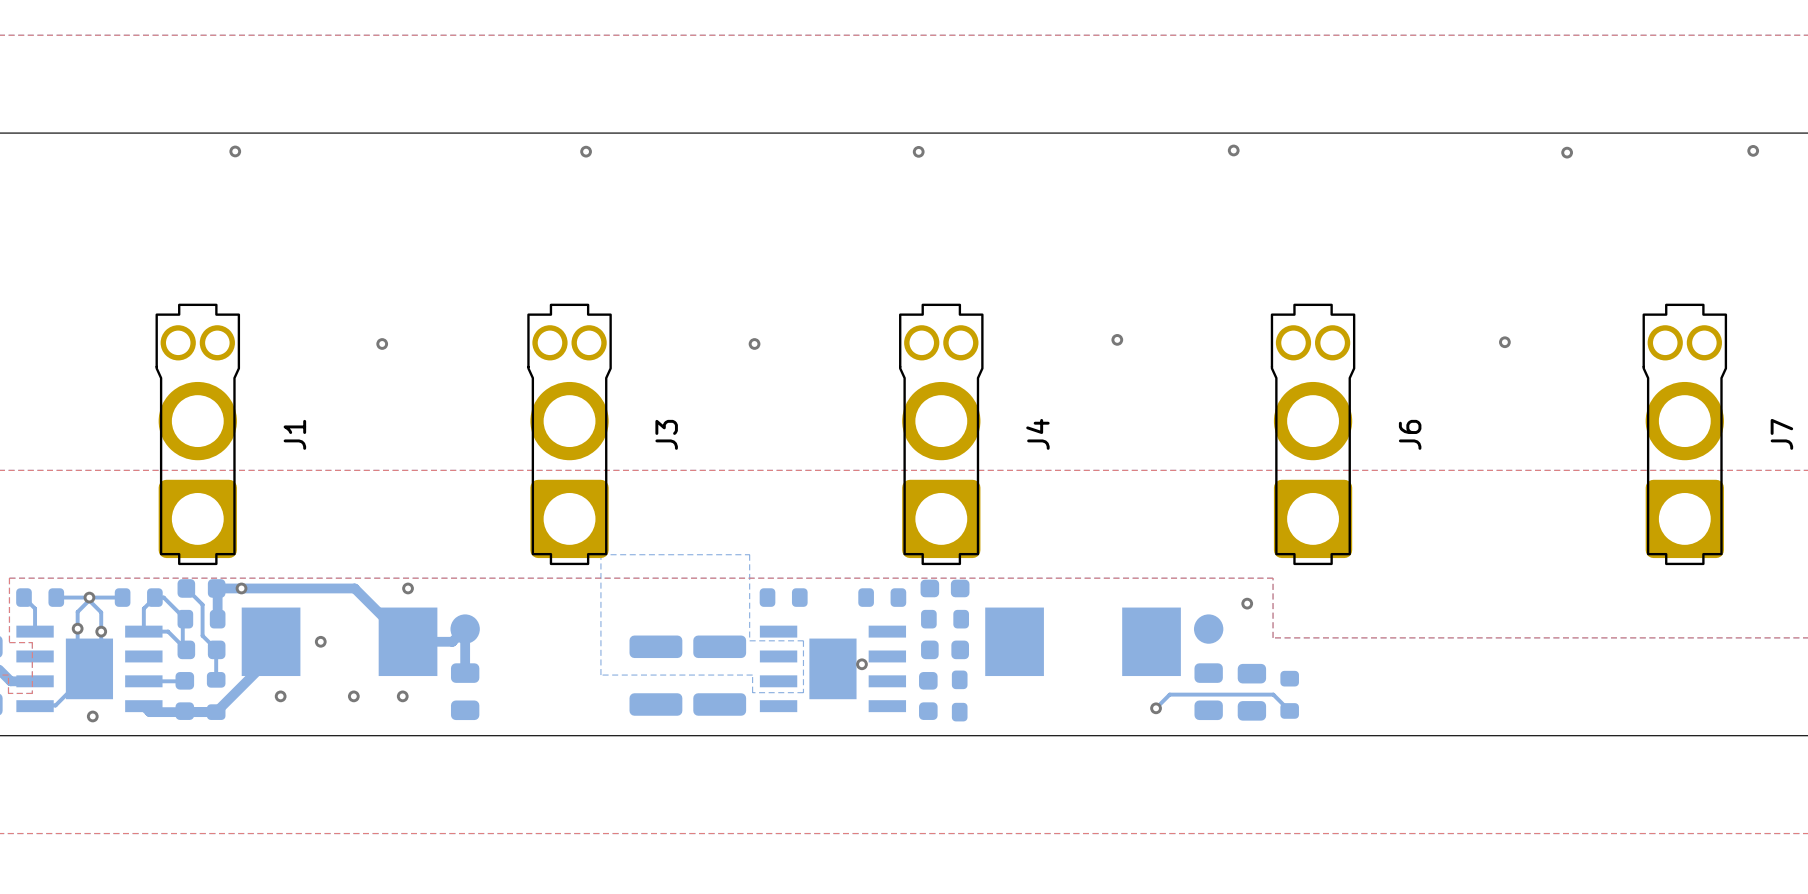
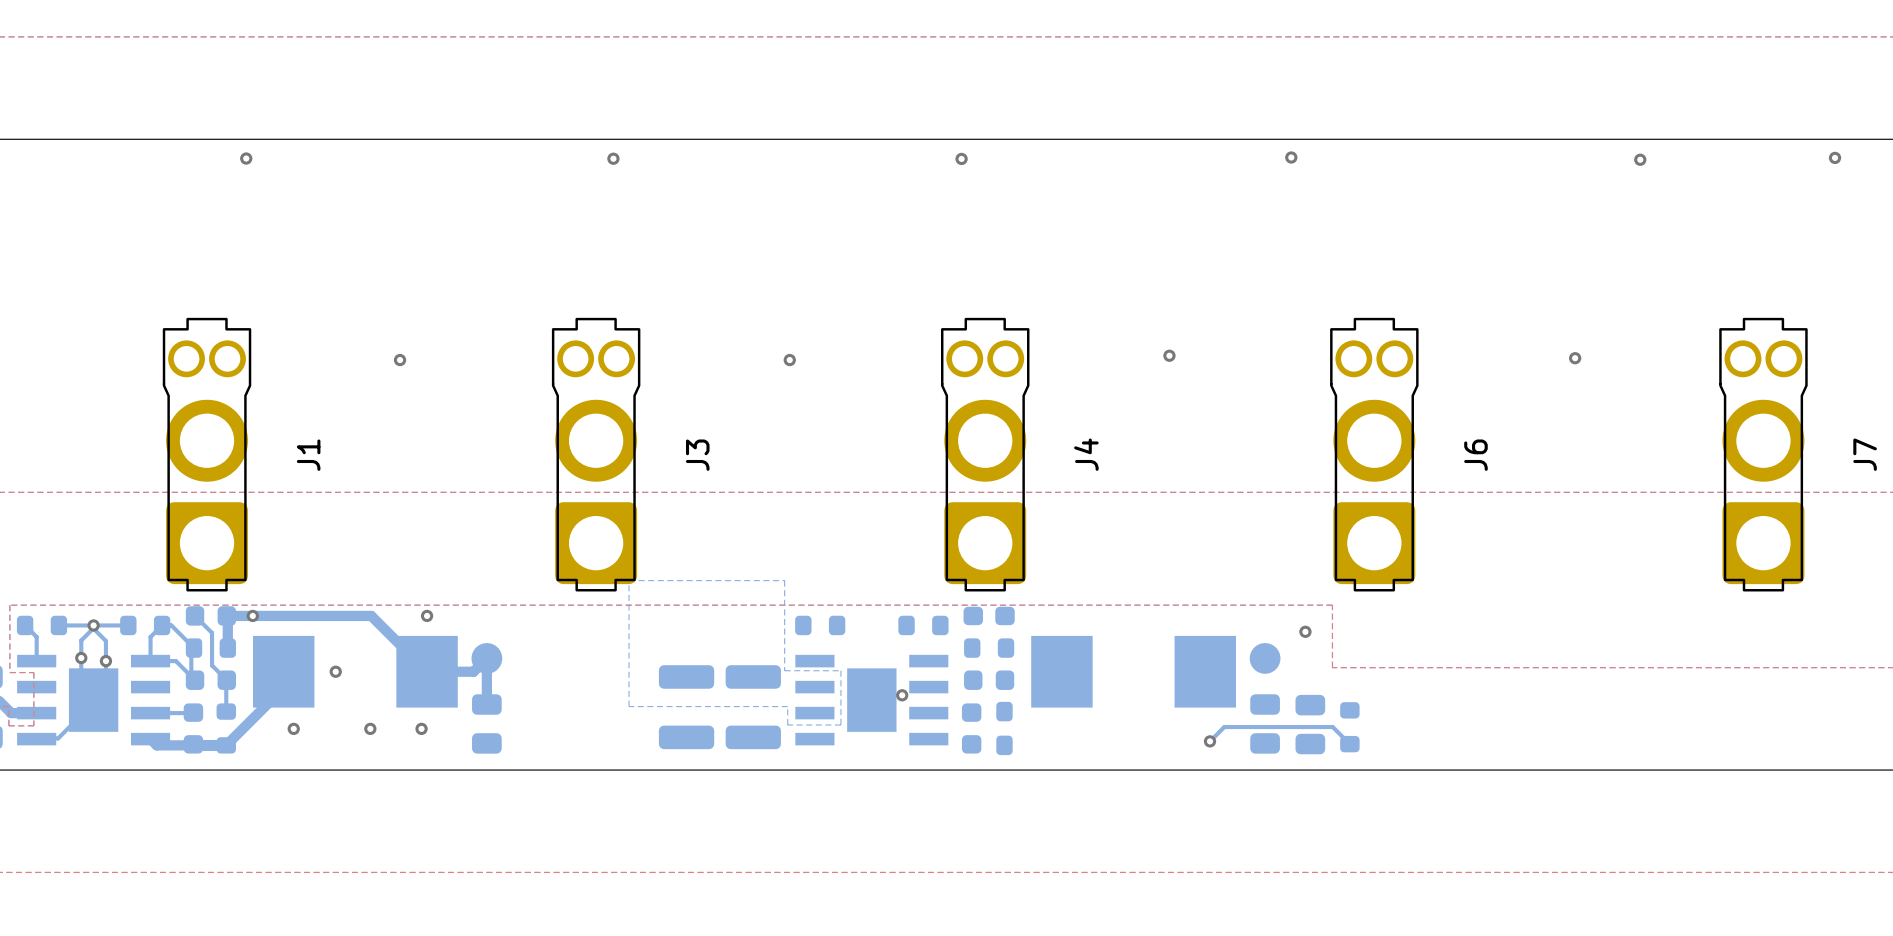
via: (92, 716) -> none

